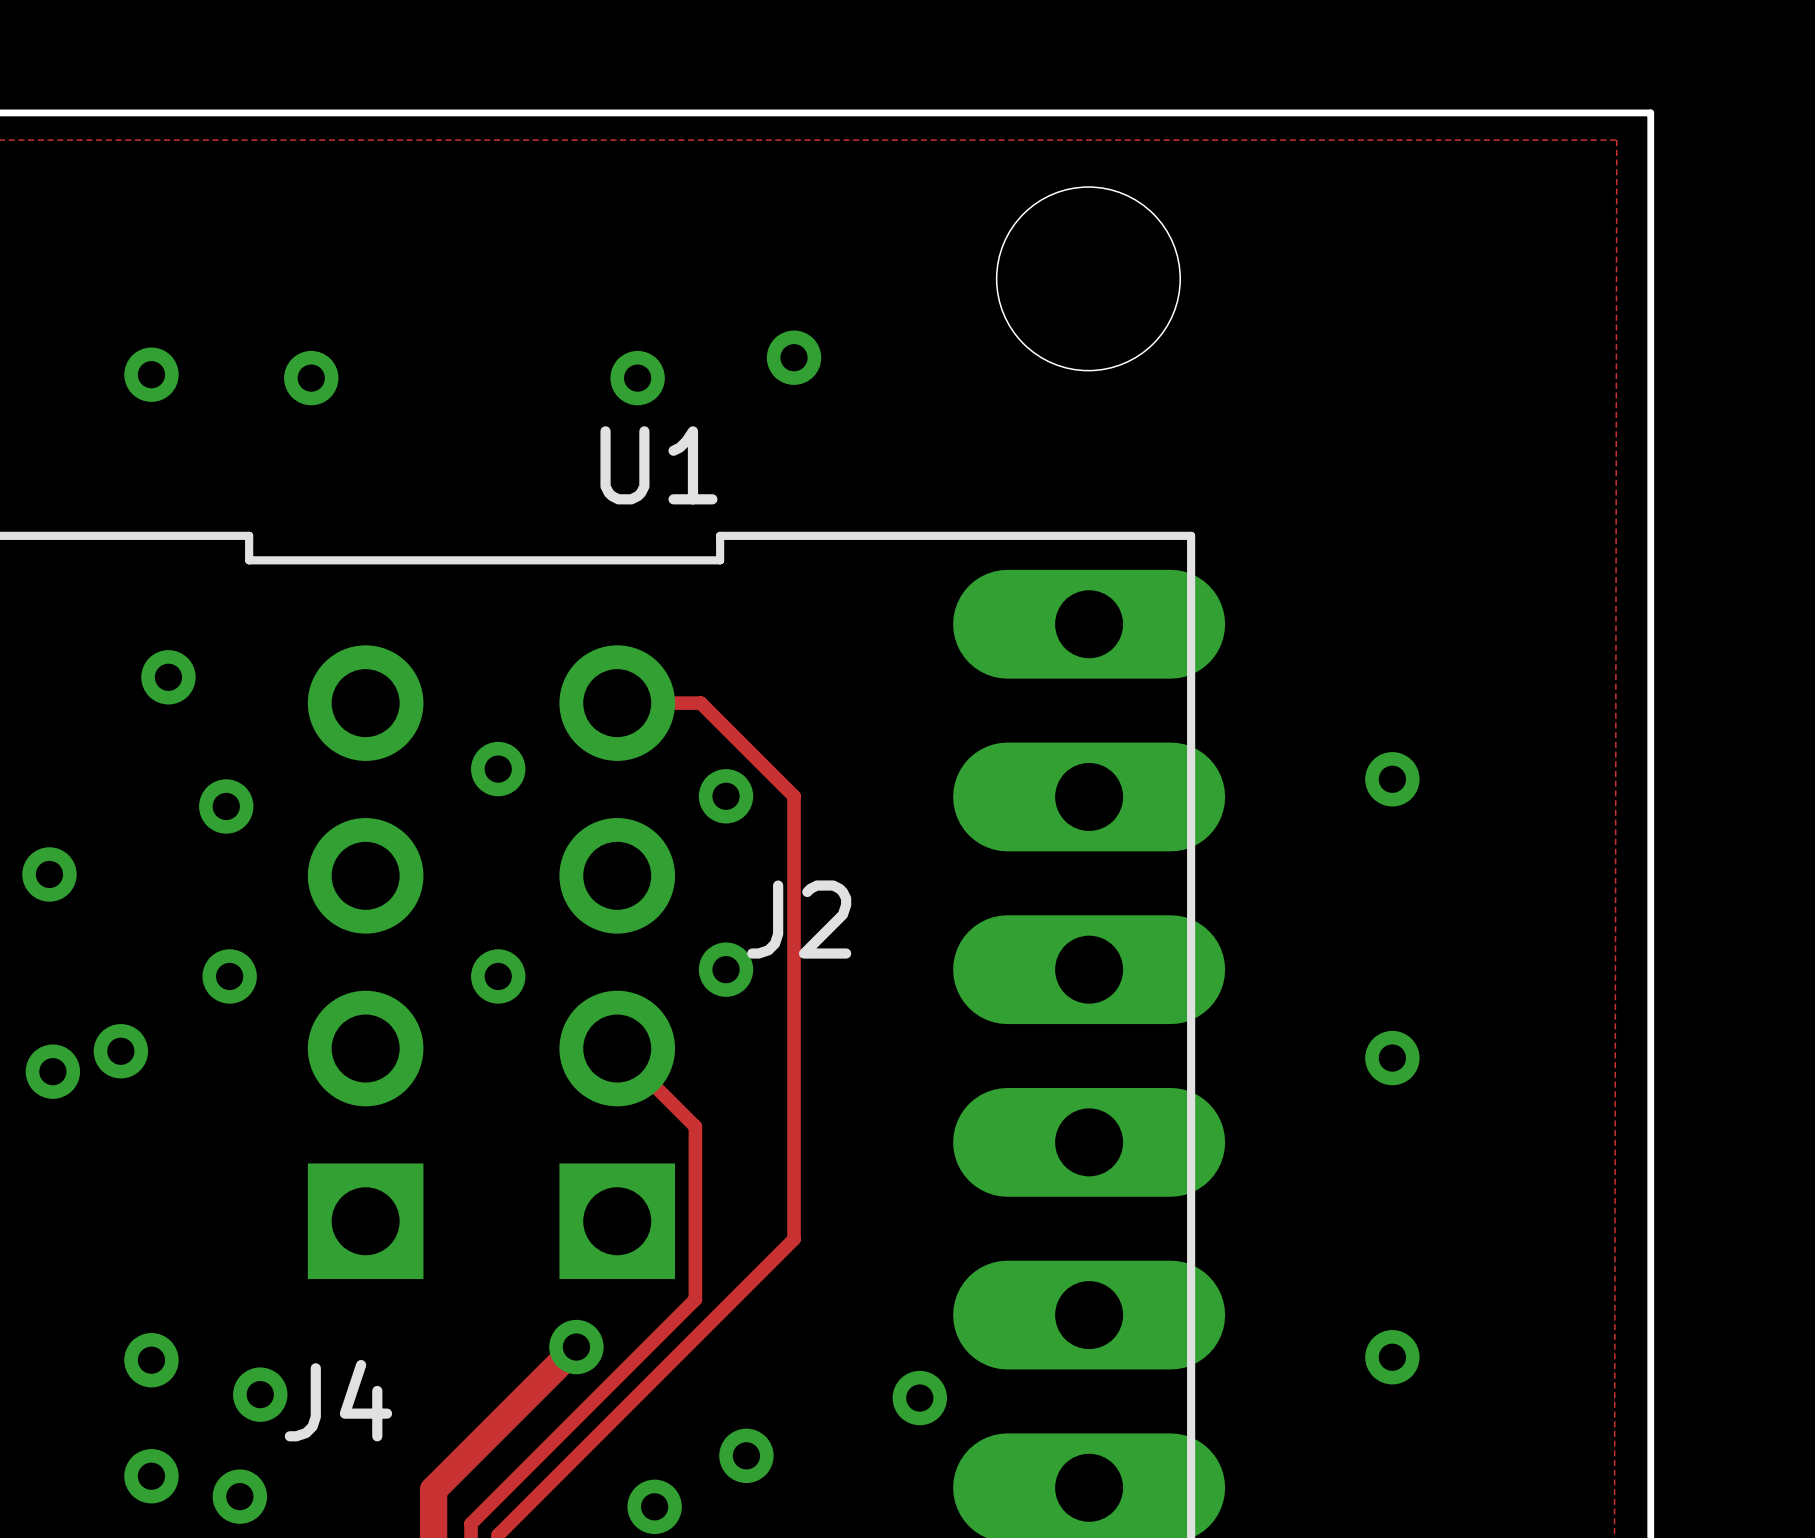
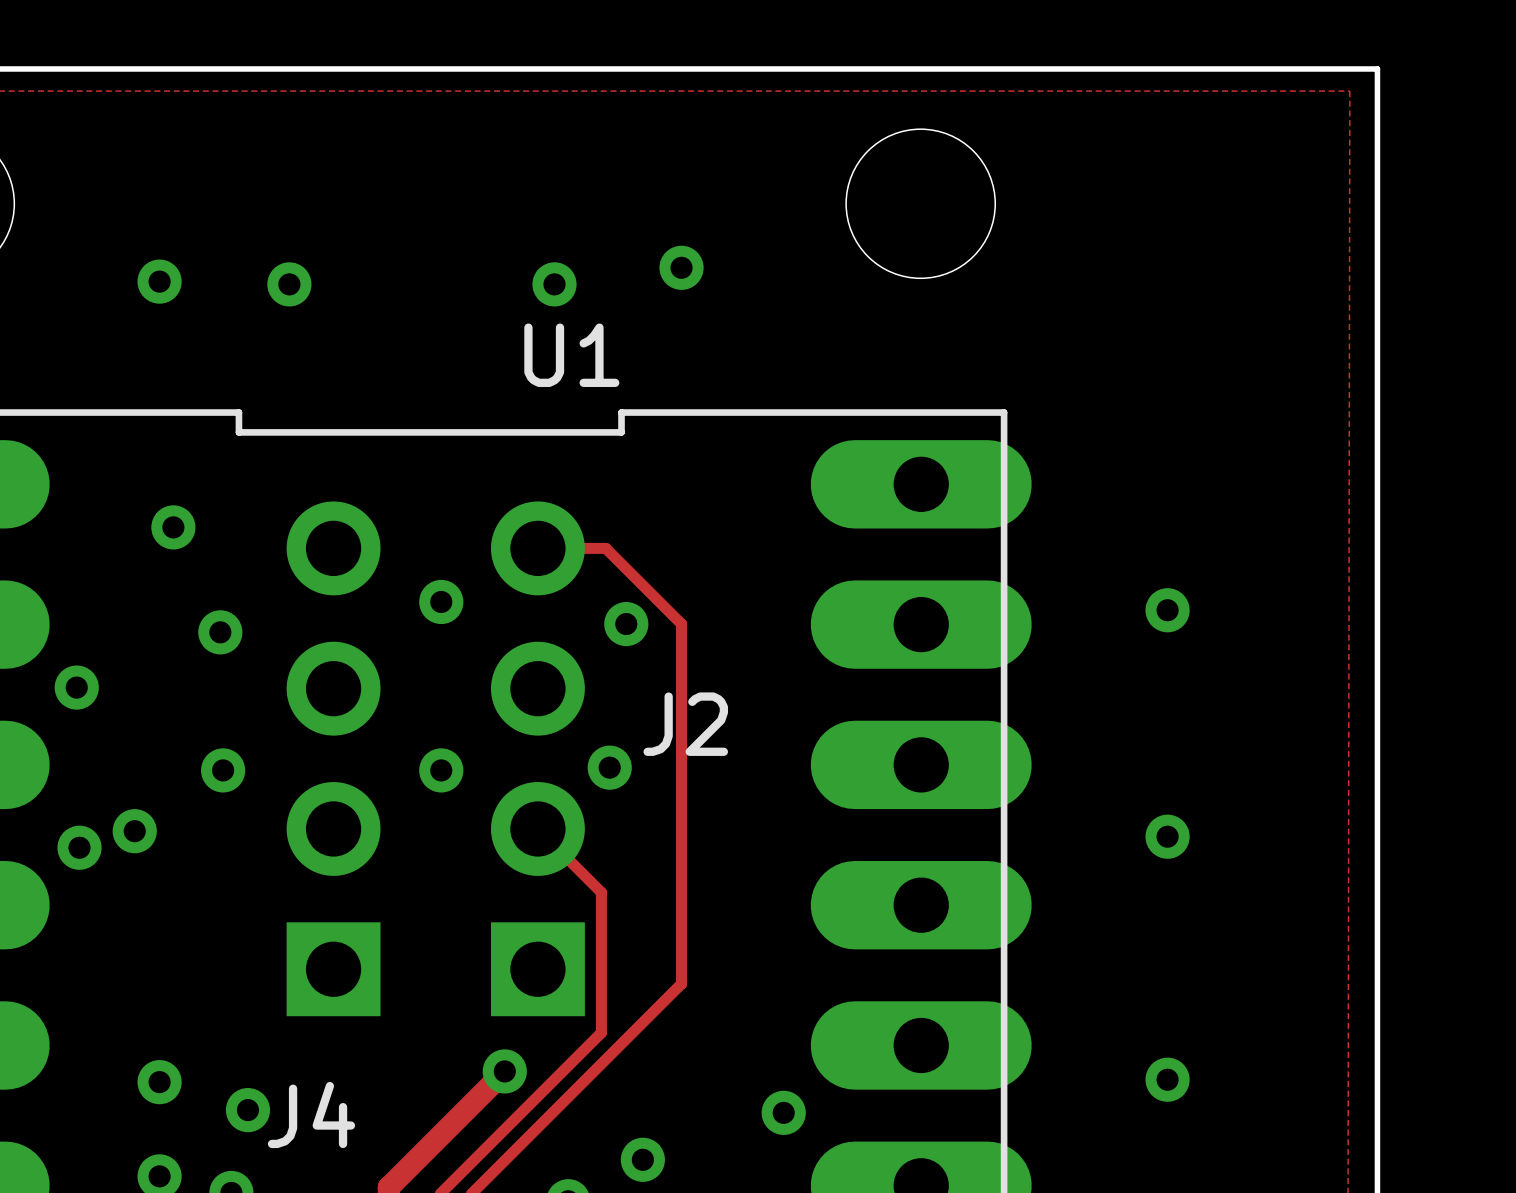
via position: (726, 969) -> (609, 767)

